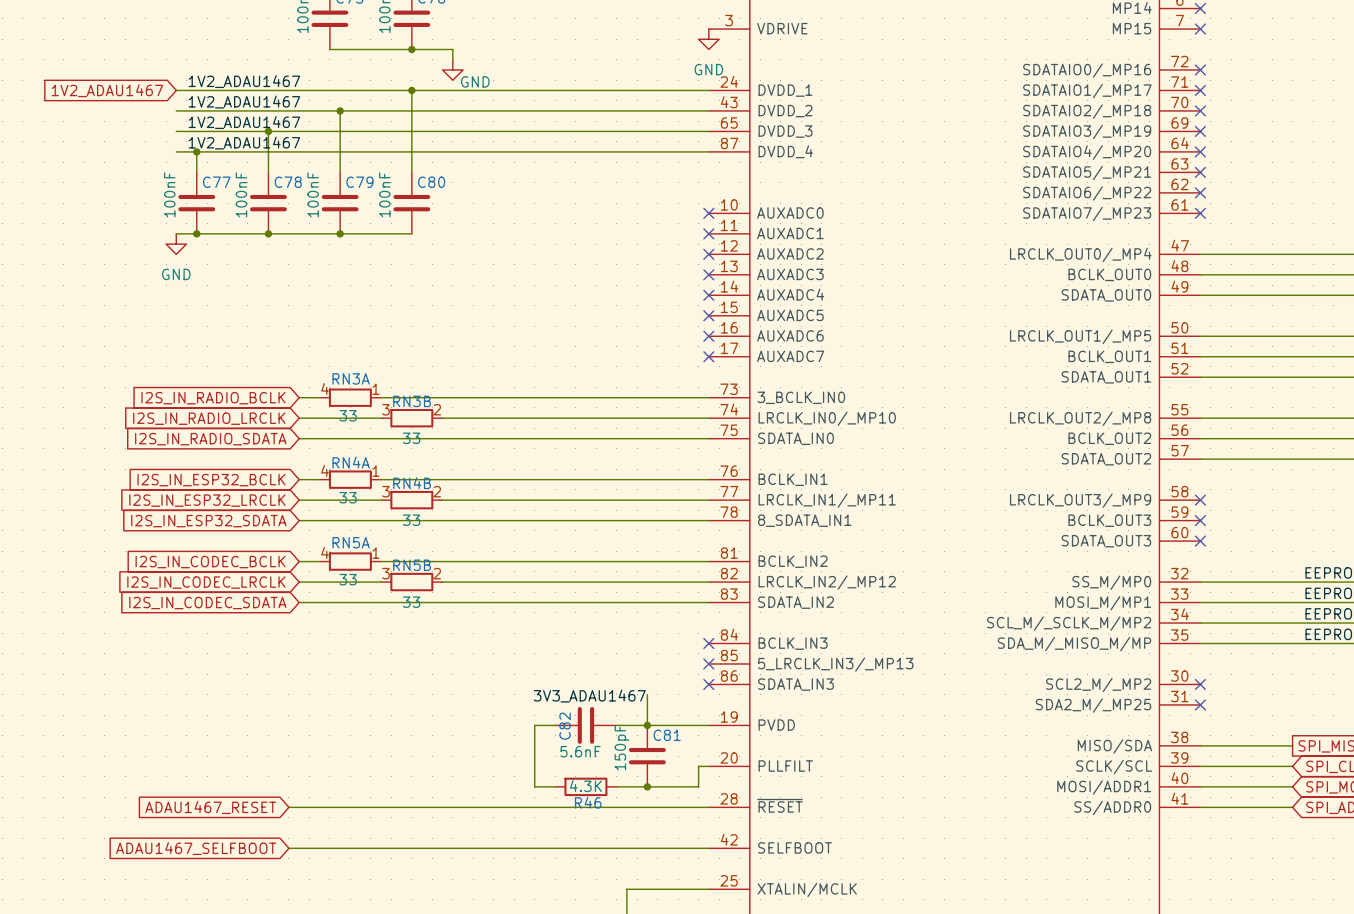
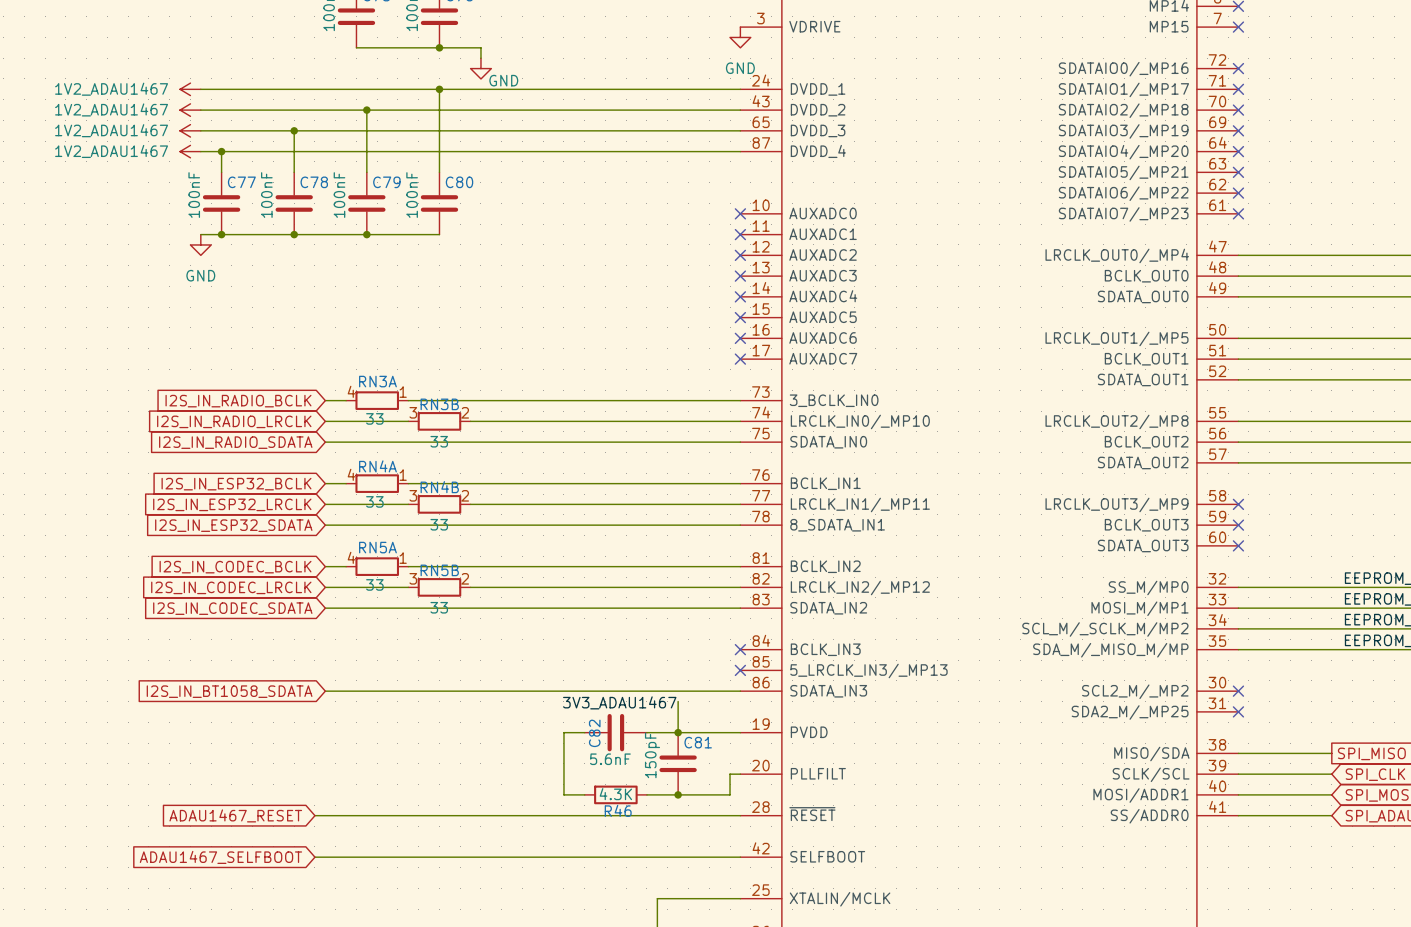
label: 1V2_ADAU1467 (244, 81) -> none
global label: 1V2_ADAU1467 (107, 90) -> none
power symbol: none -> 1V2_ADAU1467 (190, 89)
label: 1V2_ADAU1467 (244, 102) -> none
power symbol: none -> 1V2_ADAU1467 (190, 110)
label: 1V2_ADAU1467 (244, 122) -> none
power symbol: none -> 1V2_ADAU1467 (190, 130)
label: 1V2_ADAU1467 (244, 143) -> none
power symbol: none -> 1V2_ADAU1467 (190, 151)
global label: none -> I2S_IN_BT1058_SDATA (229, 691)
wire: none -> (325, 691) (740, 691)
no-connect mark: (708, 684) -> none

